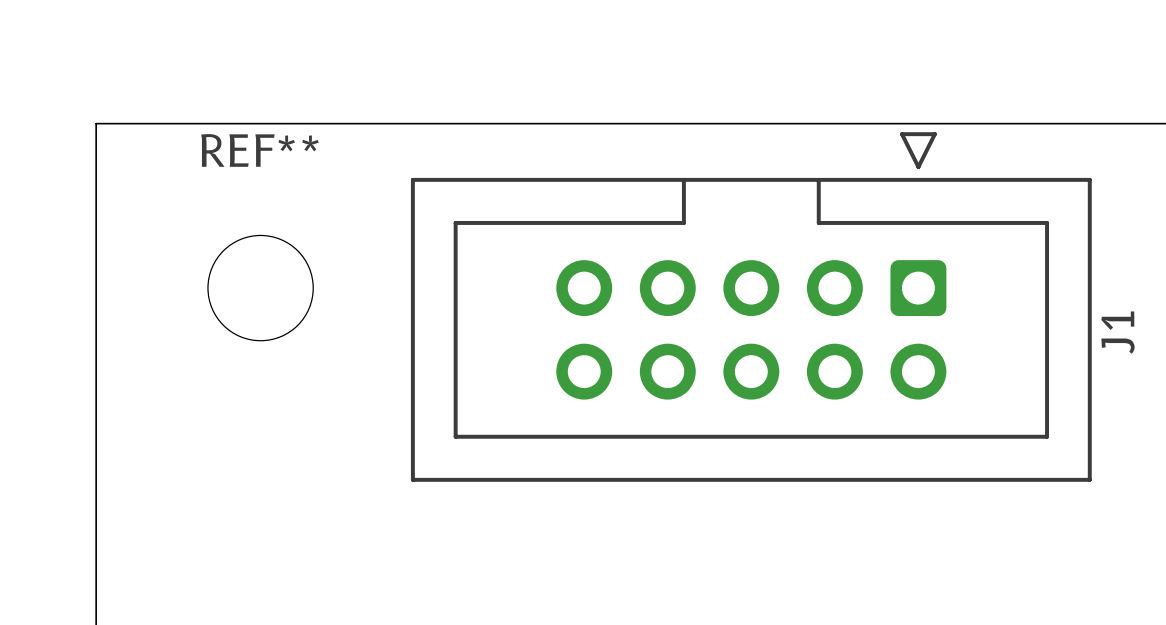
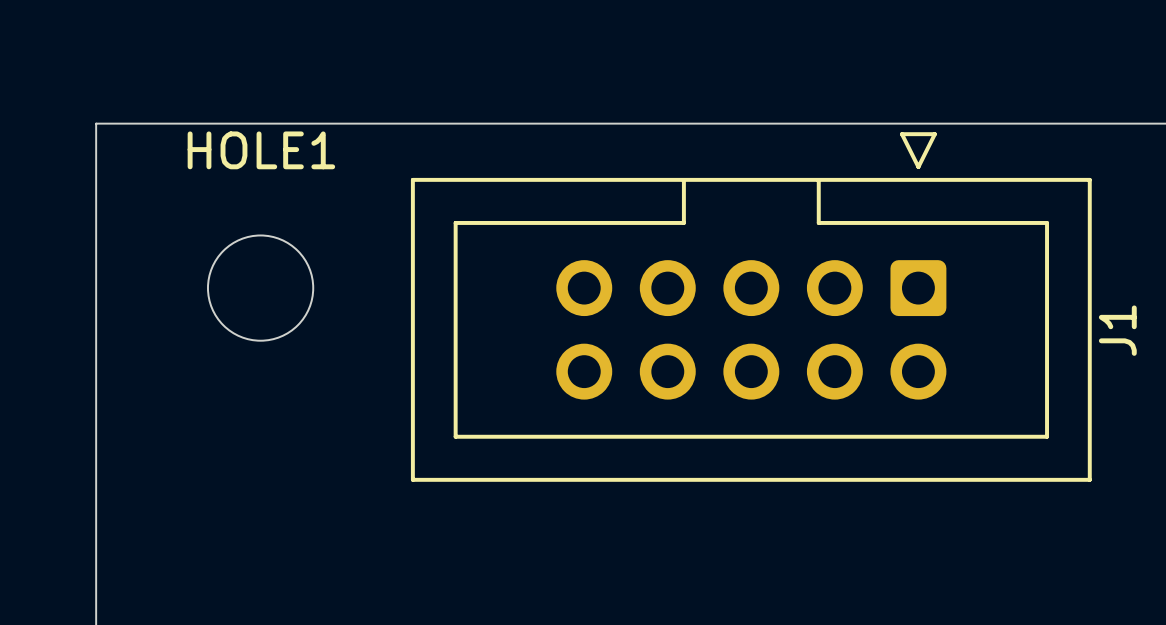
REF** name: REF** (260, 150) -> HOLE1 (261, 150)

